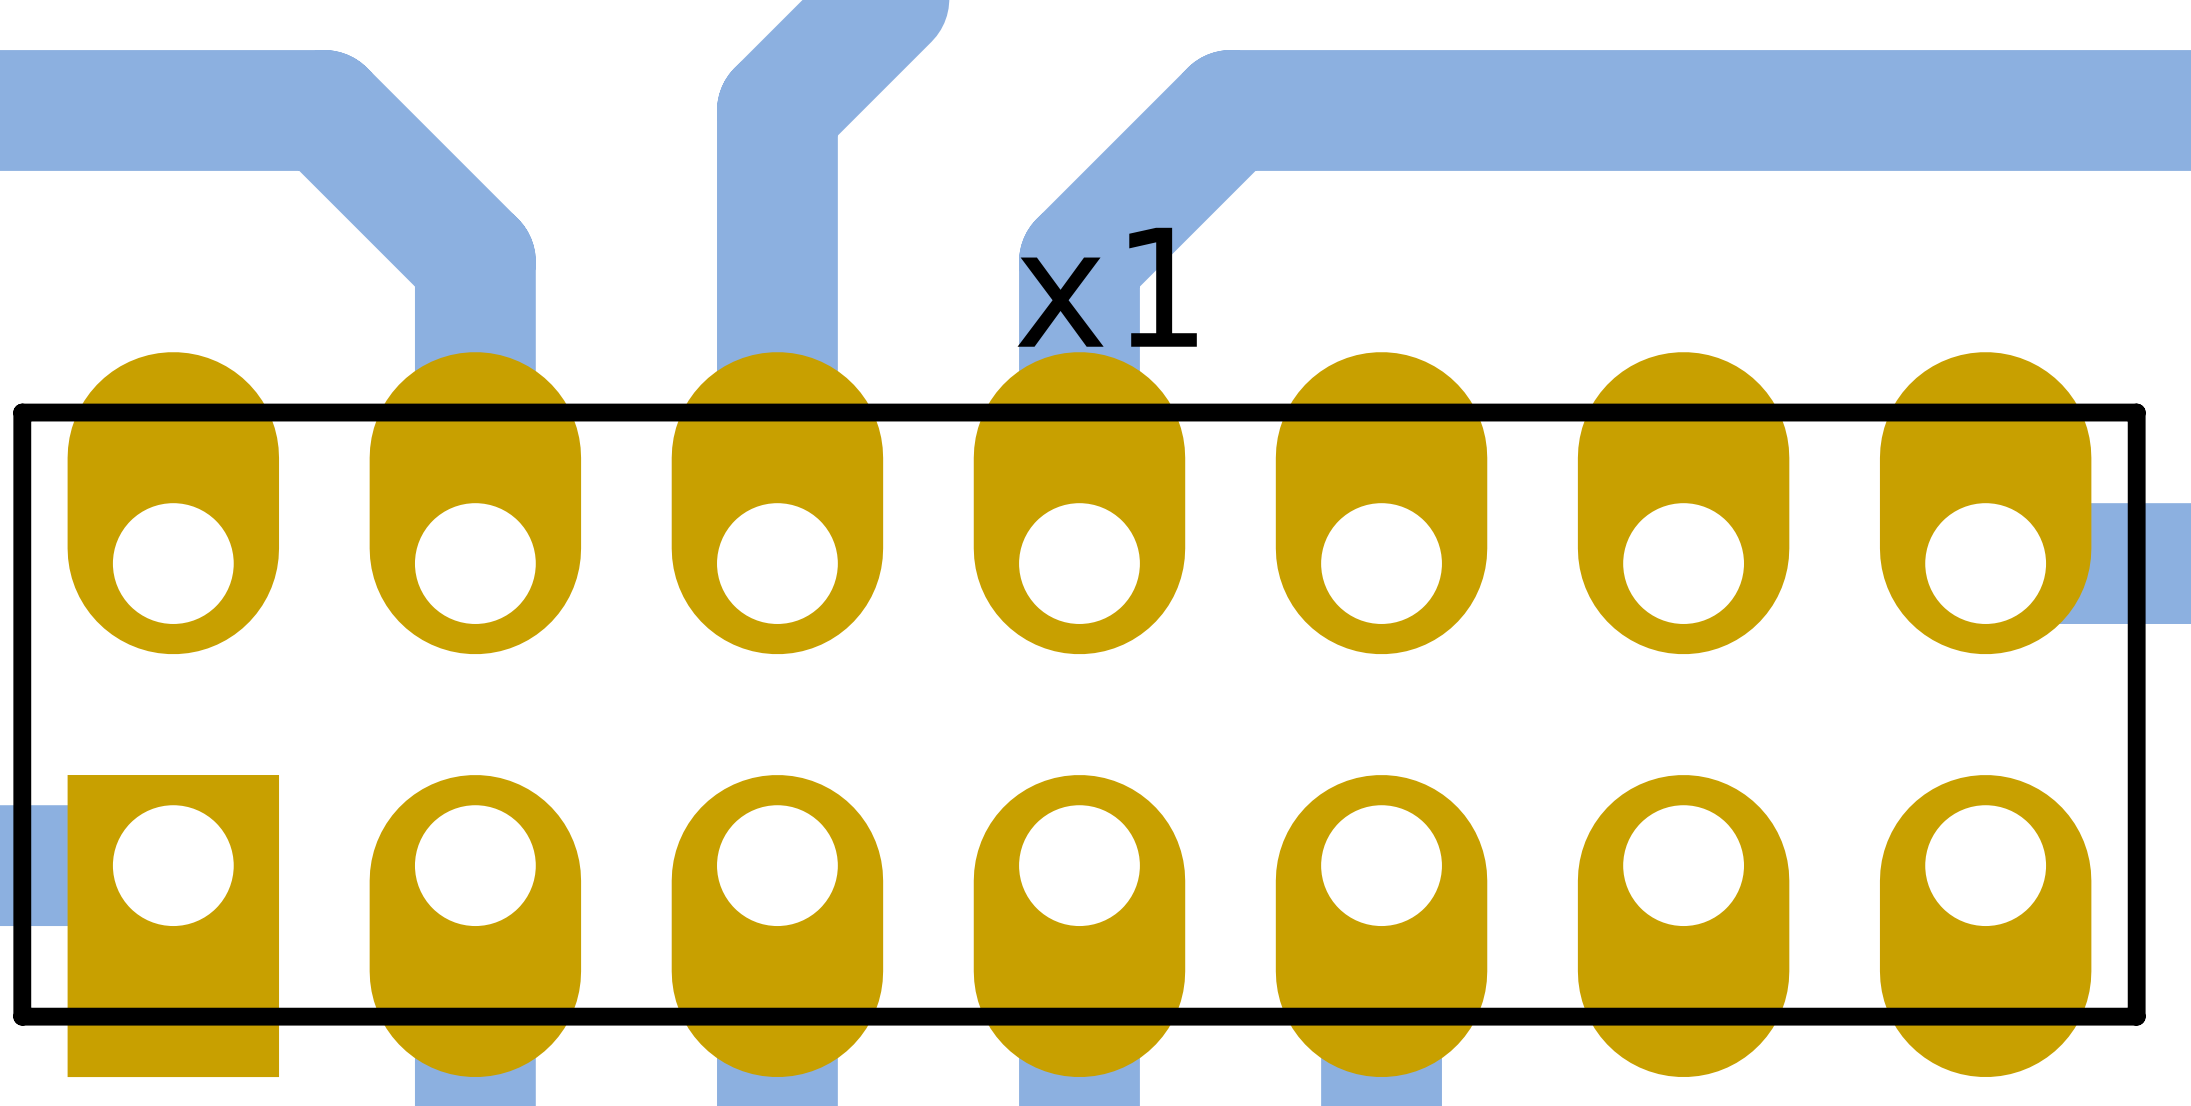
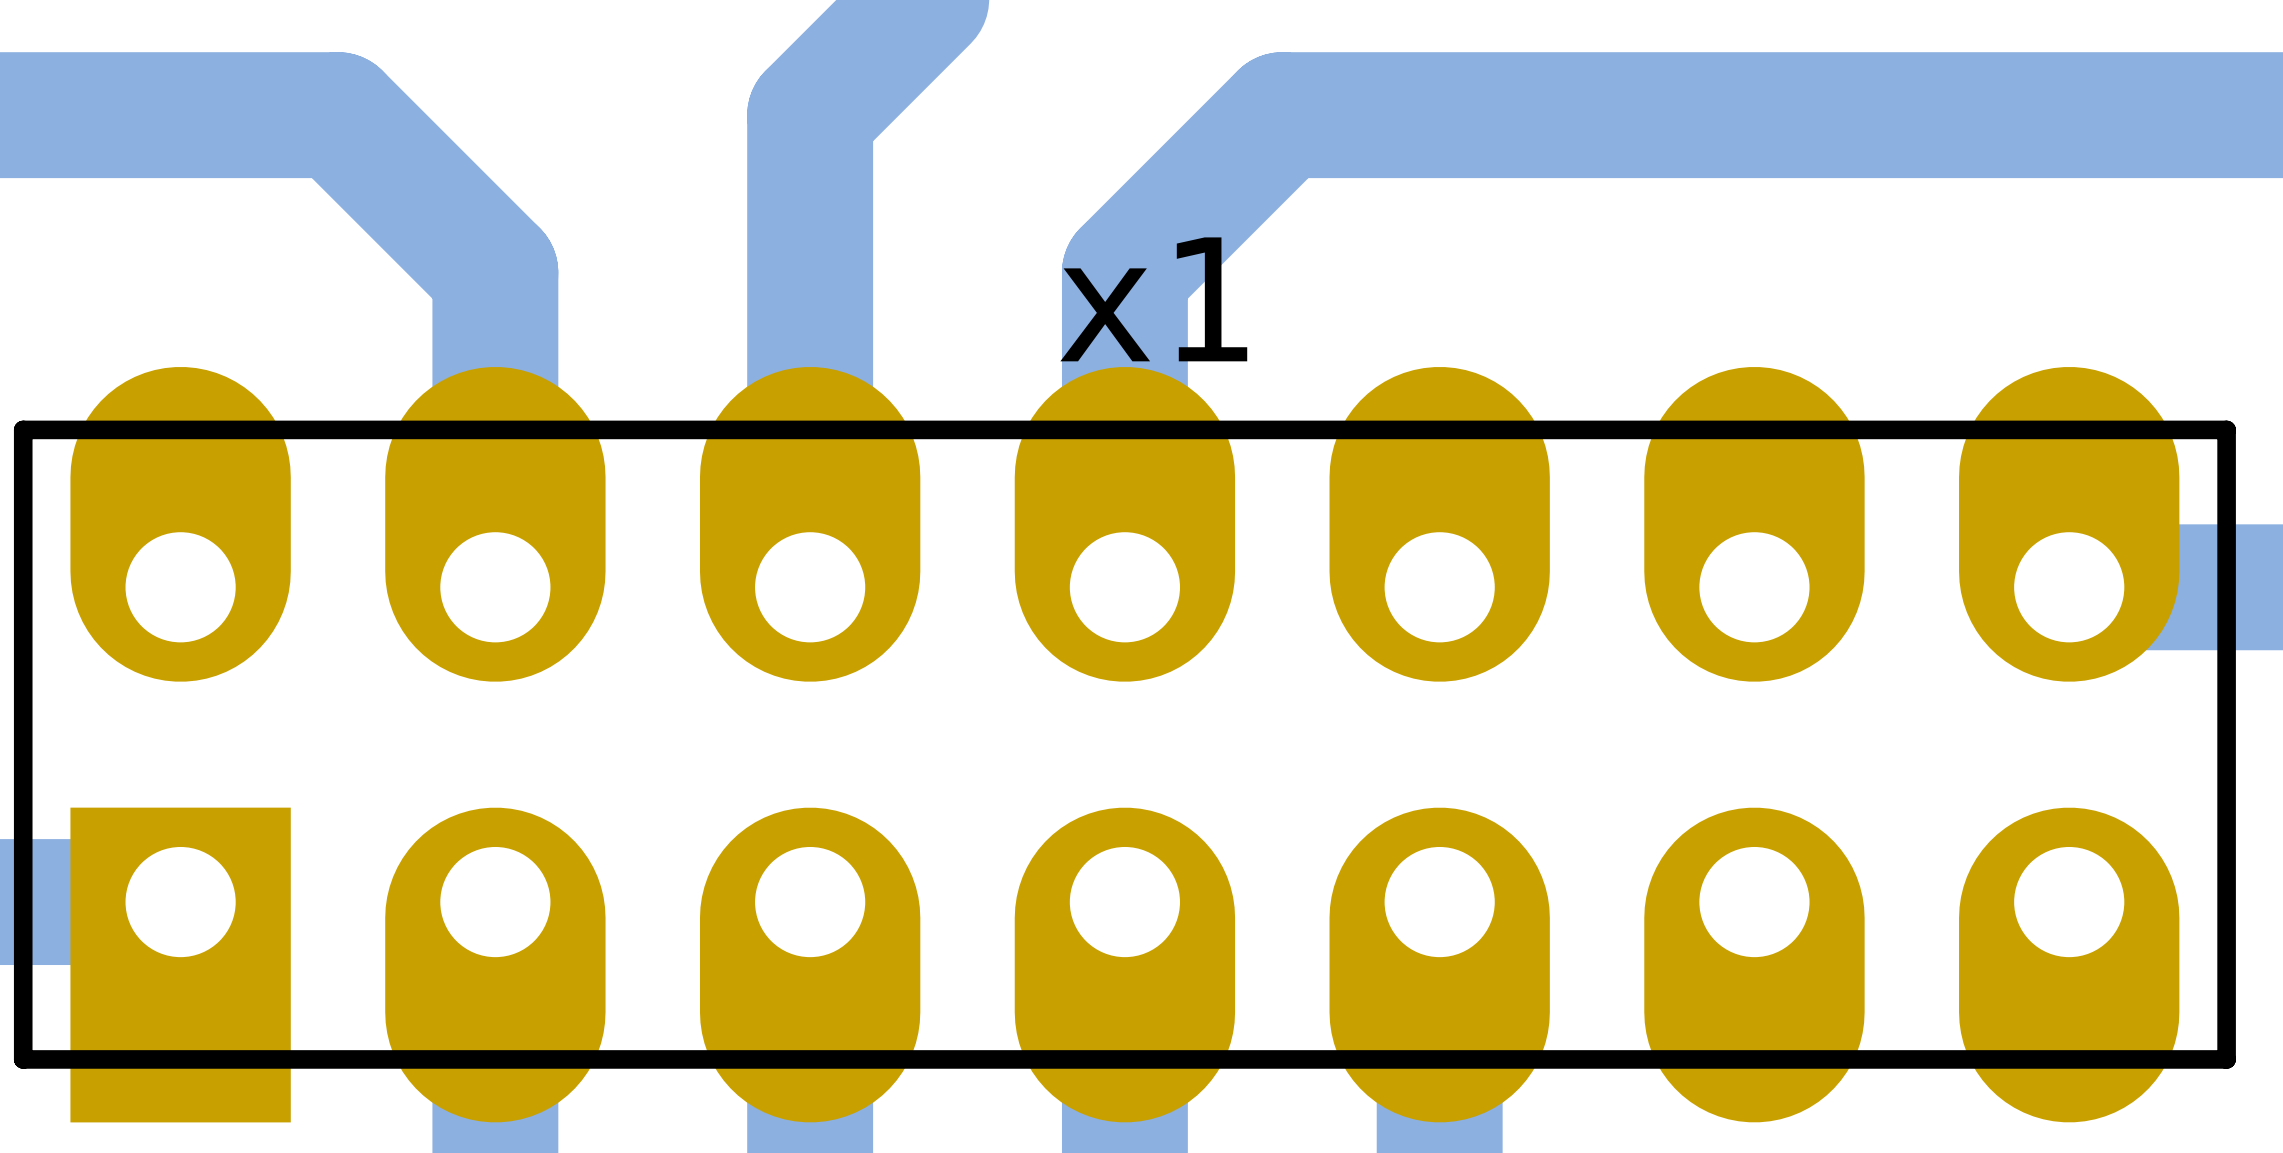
x1 footprint: [13, 352, 2146, 1078] -> [13, 366, 2236, 1123]

